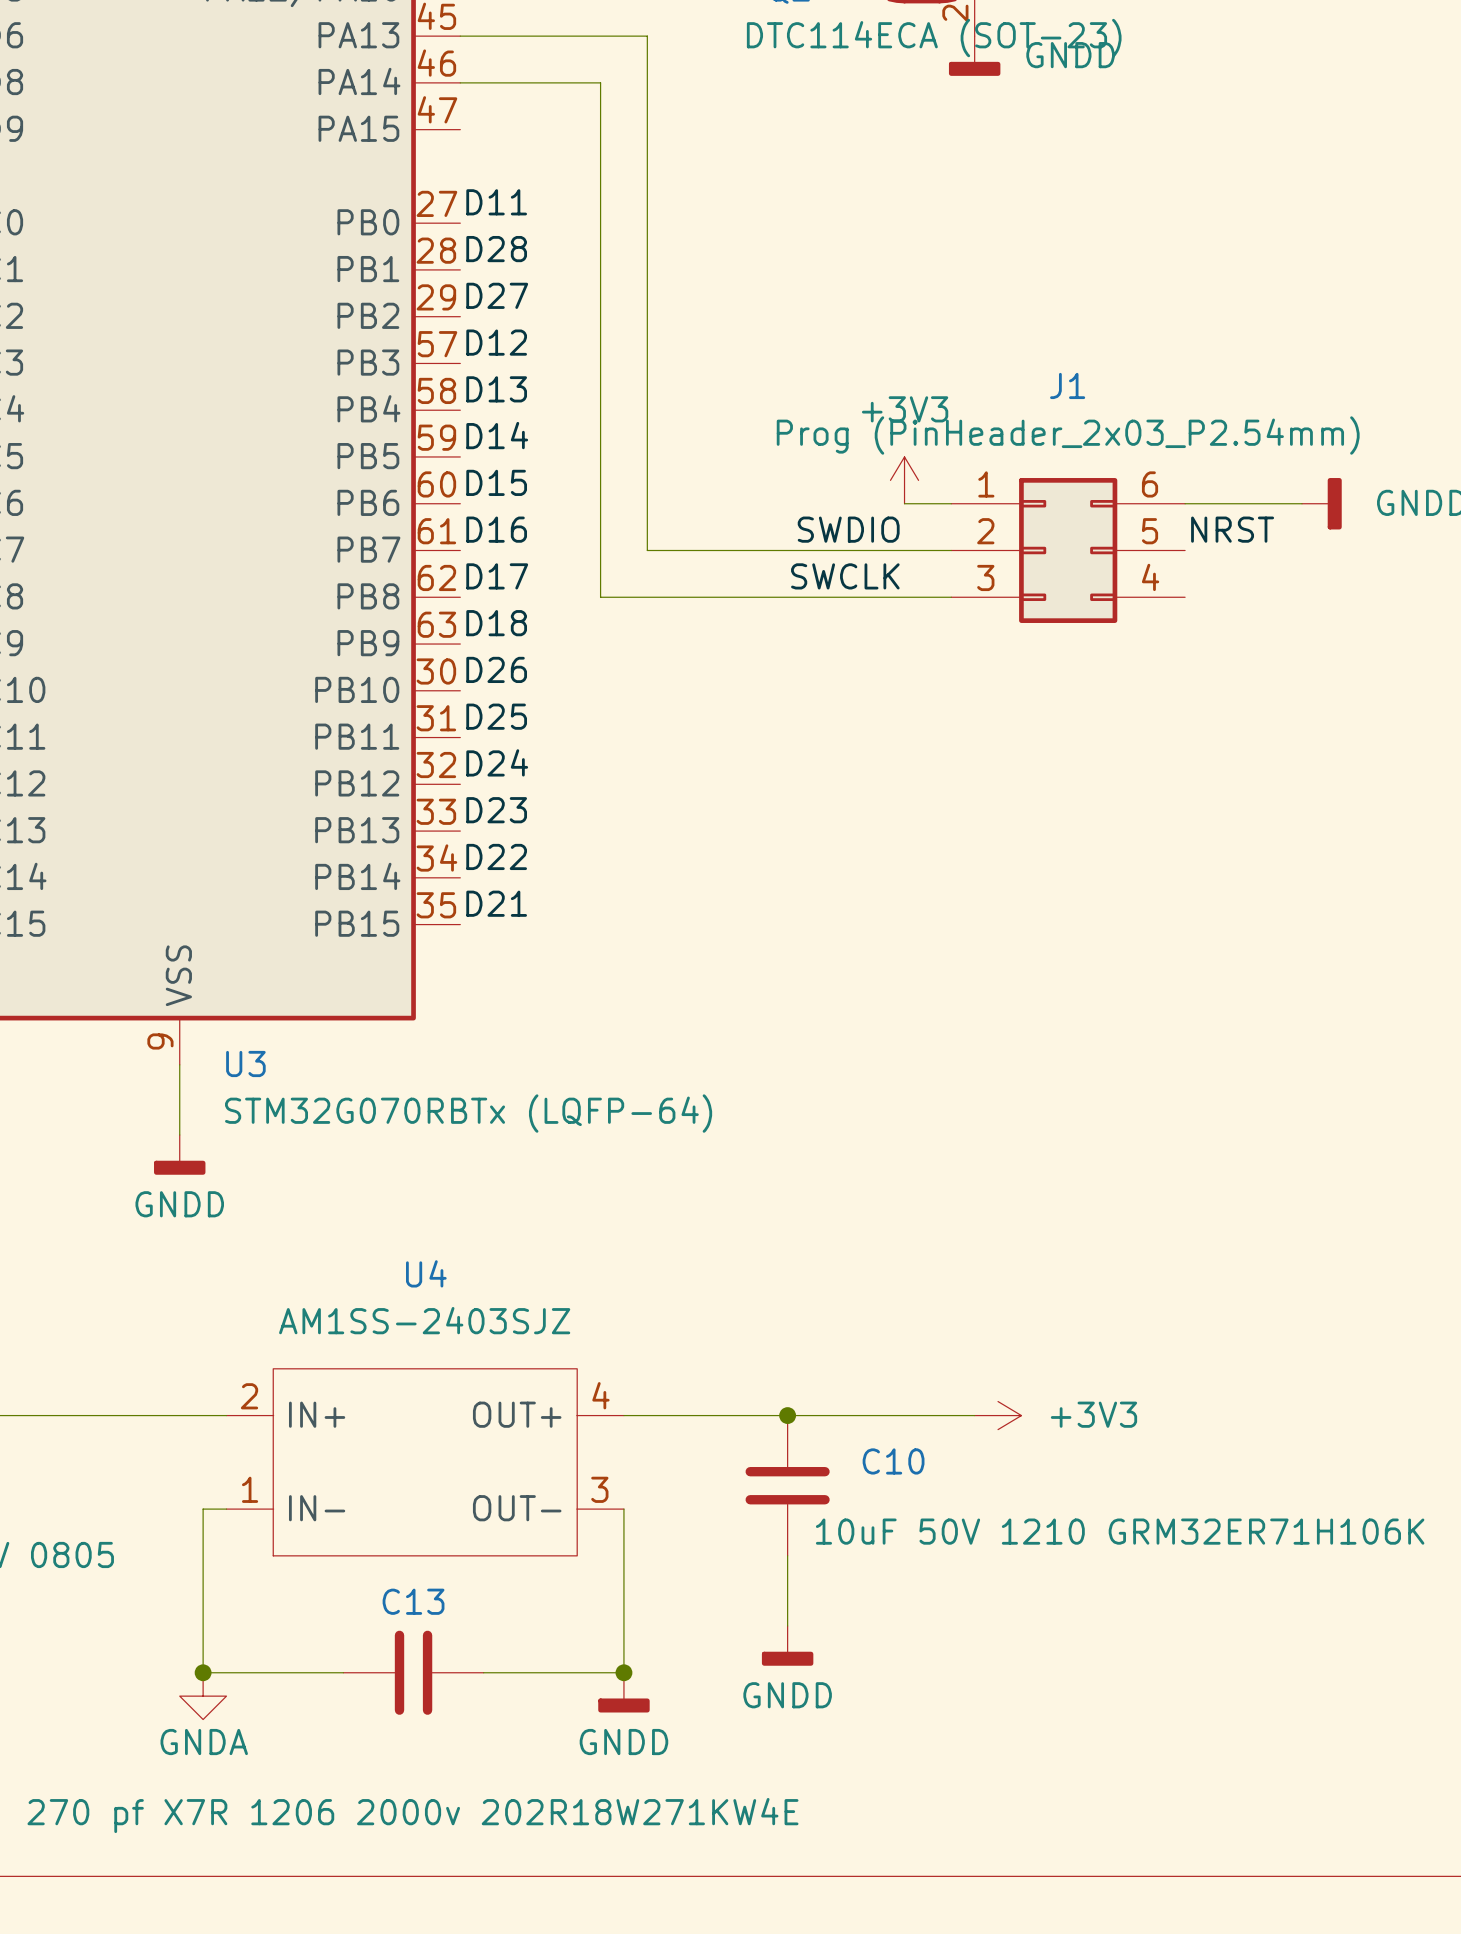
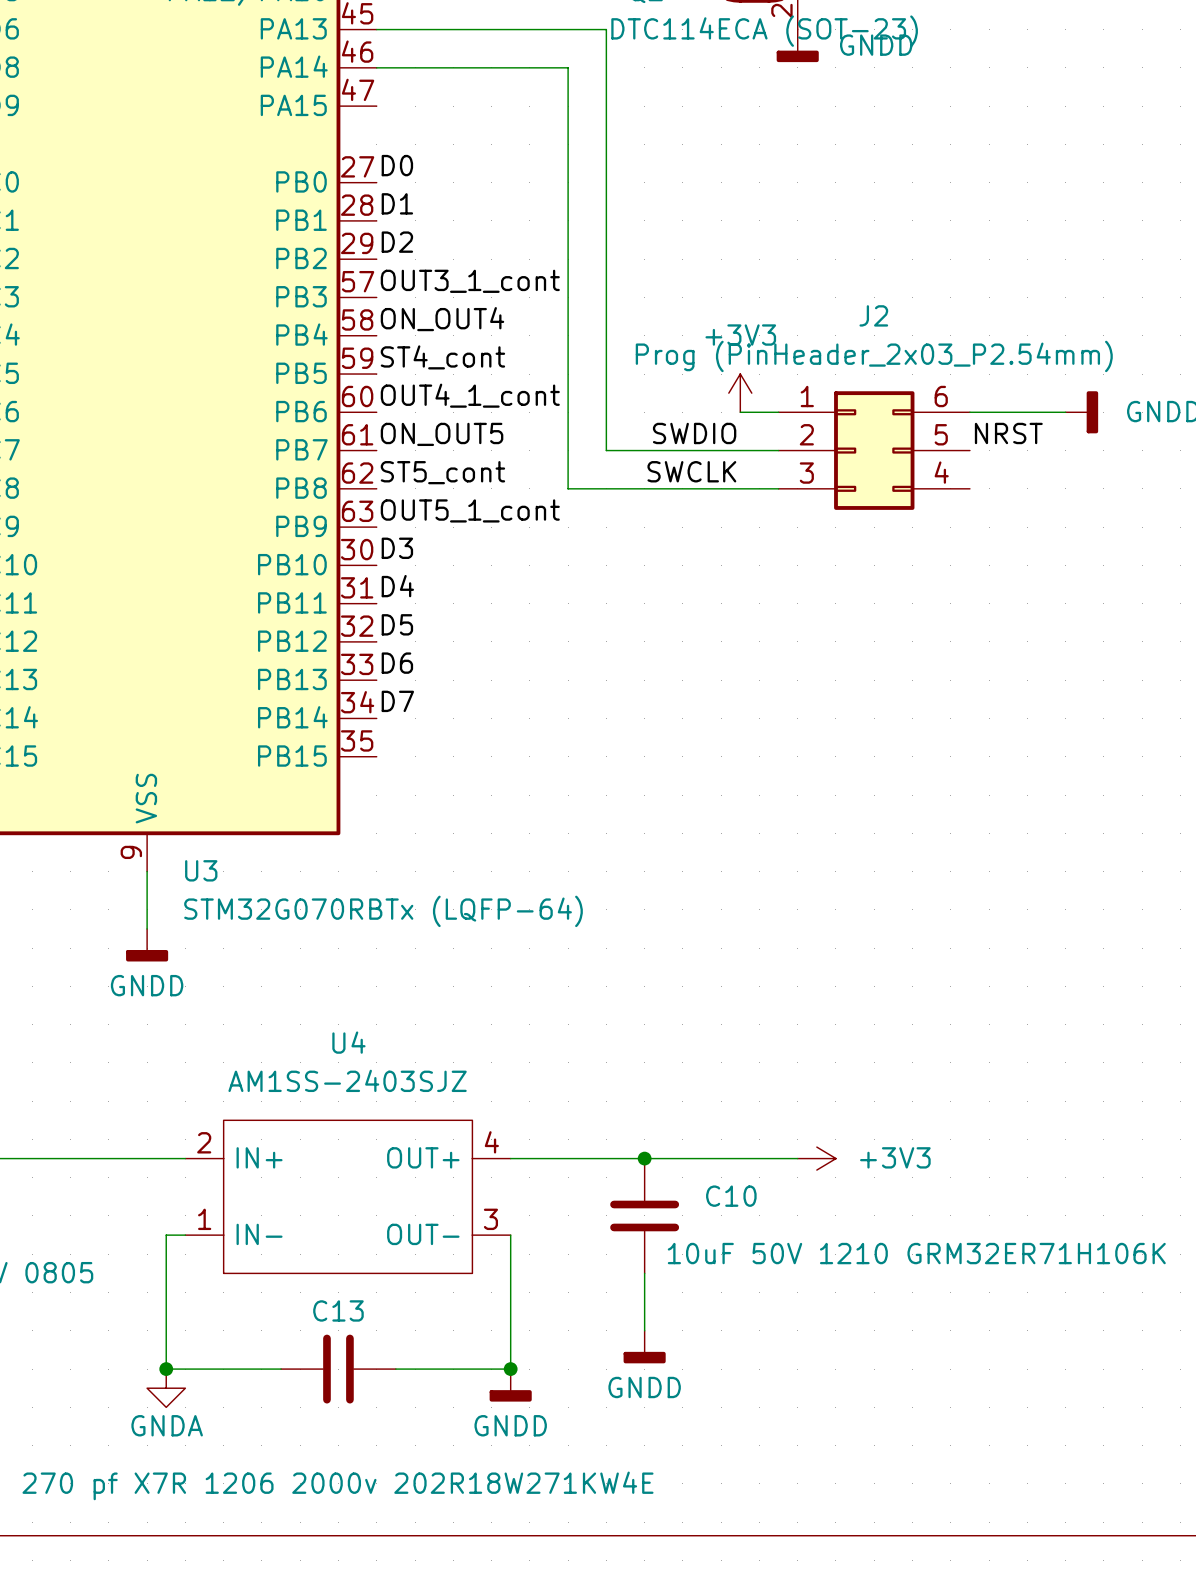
wire: (647, 36) (647, 550) (740, 550) -> (529, 29) (606, 29) (606, 450)
wire: (600, 82) (600, 597) (694, 597) -> (491, 67) (568, 67) (568, 488)
label: D11 (496, 202) -> D0 (397, 165)
label: D28 (496, 249) -> D1 (397, 203)
label: D27 (497, 295) -> D2 (397, 242)
label: D12 (496, 342) -> OUT3_1_cont (470, 281)
J1 name: J1 (1067, 385) -> J2 (873, 315)
label: D13 (496, 389) -> ON_OUT4 (442, 319)
label: D14 (497, 435) -> ST4_cont (442, 357)
label: D15 (496, 482) -> OUT4_1_cont (470, 395)
label: D16 (496, 529) -> ON_OUT5 (442, 434)
label: D17 (497, 576) -> ST5_cont (442, 472)
label: D18 (496, 623) -> OUT5_1_cont (470, 510)
label: D26 (496, 669) -> D3 (397, 548)
label: D25 (496, 716) -> D4 (397, 586)
label: D24 (497, 762) -> D5 (397, 624)
label: D23 (496, 810) -> D6 (397, 663)
label: D22 (496, 856) -> D7 (397, 701)
label: D21 (496, 903) -> none

